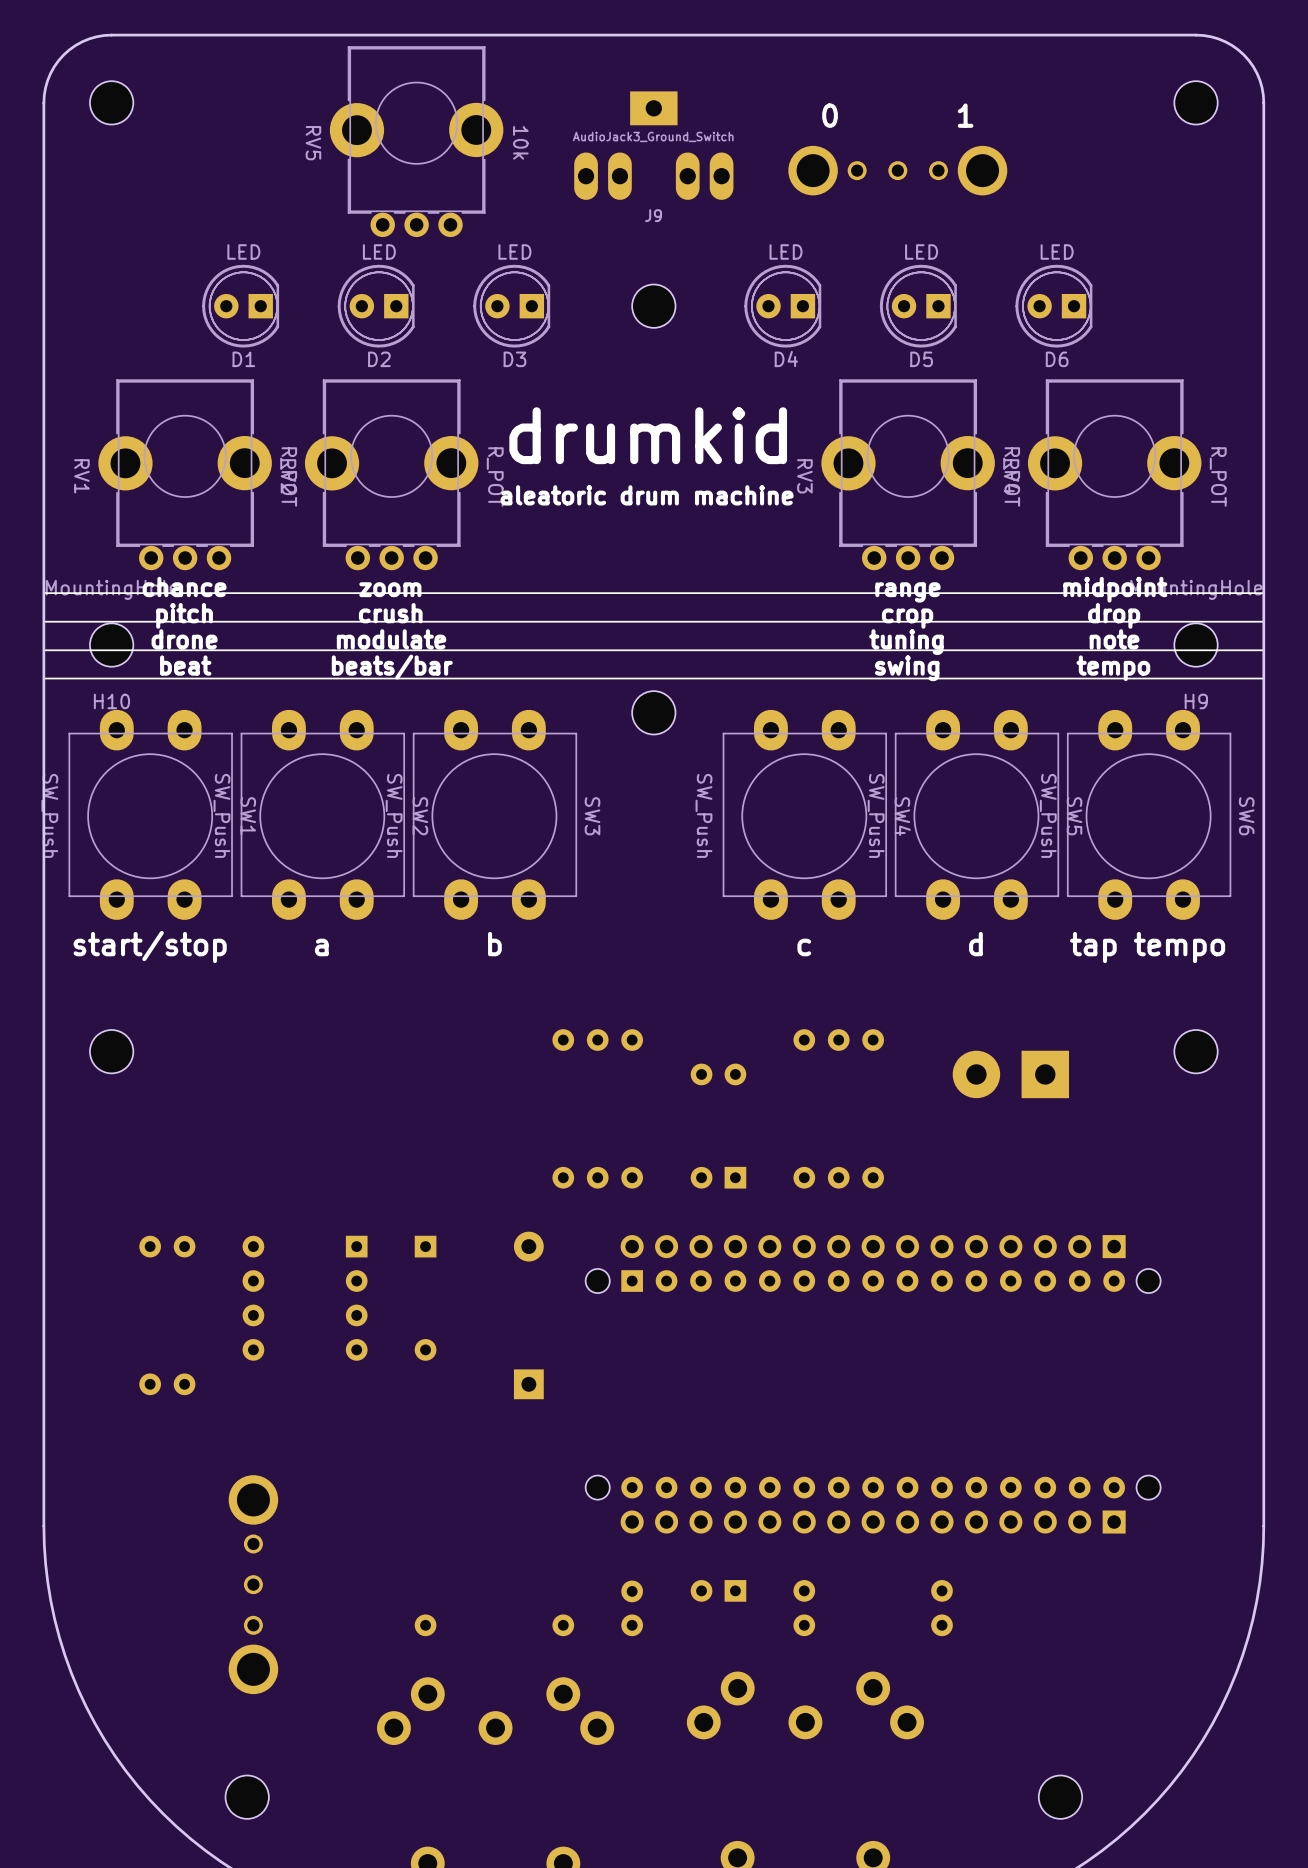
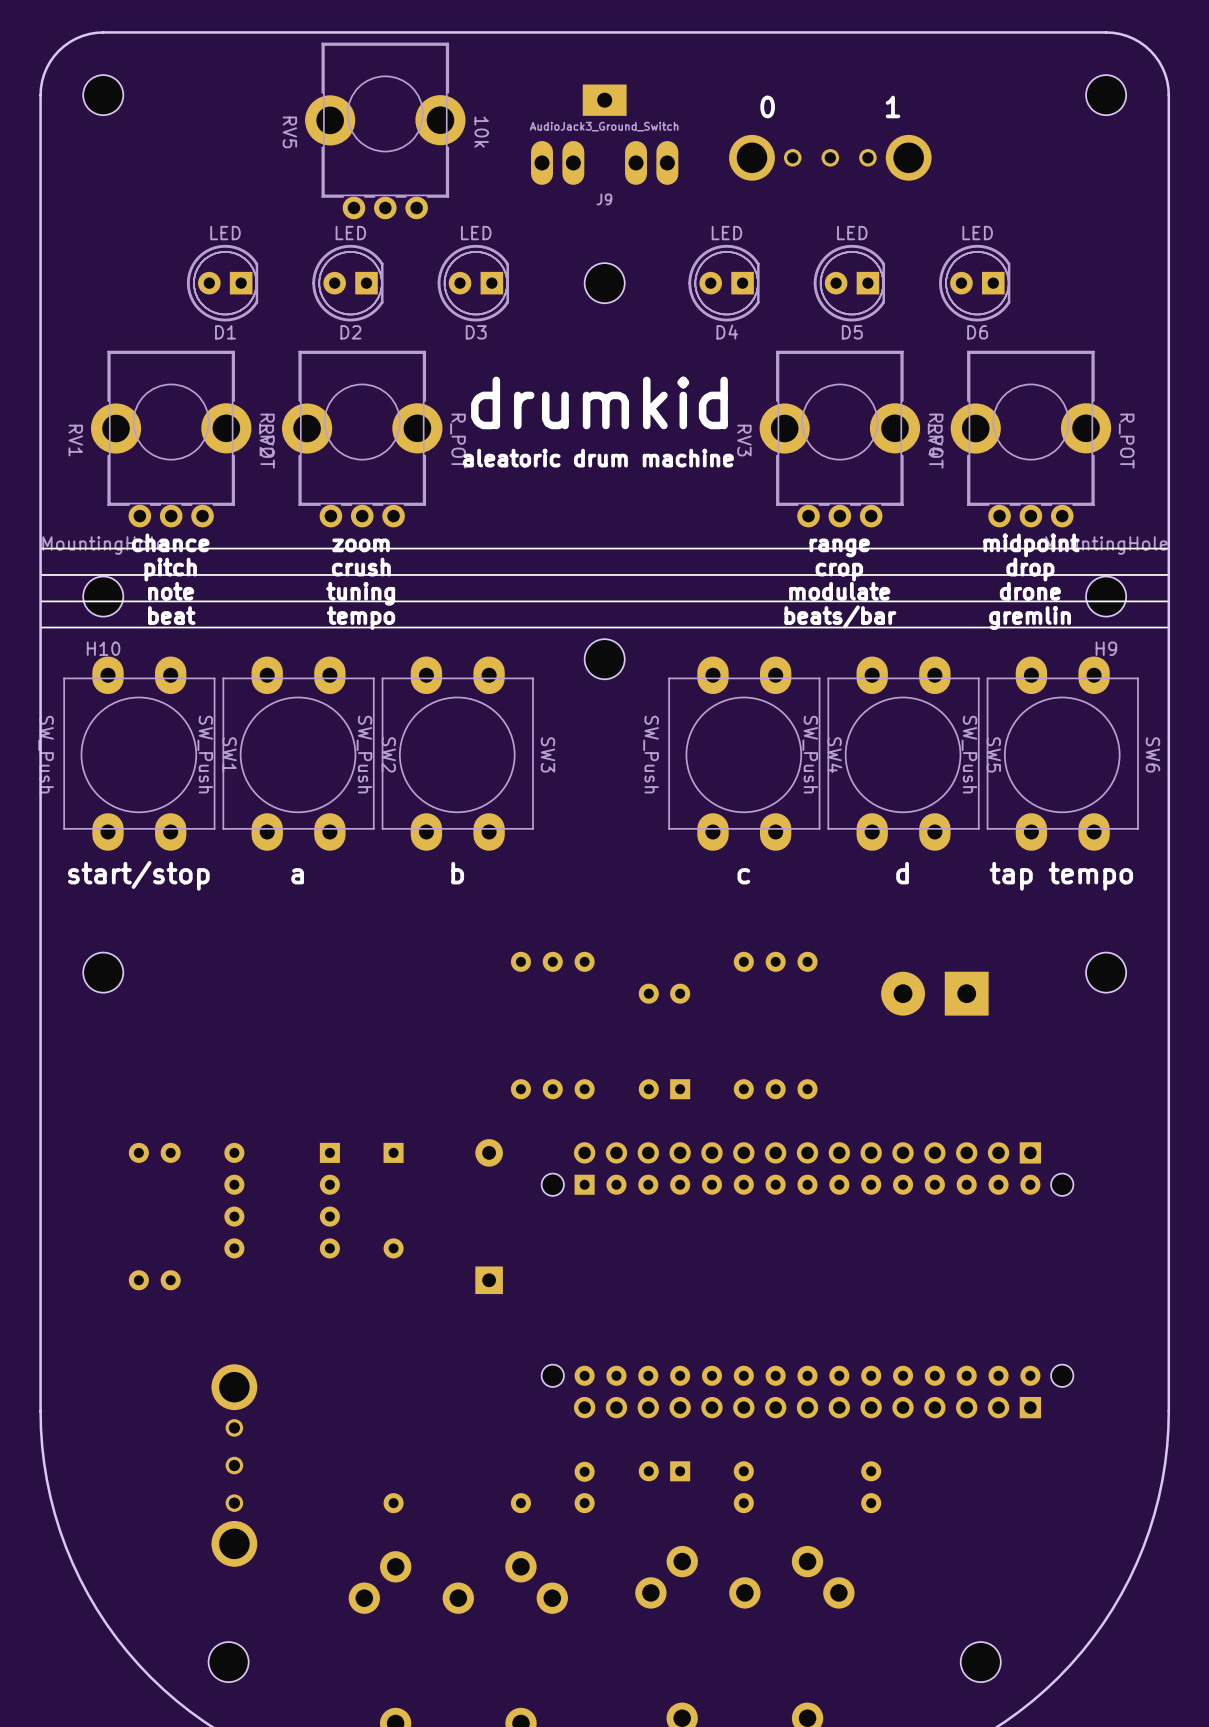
text: drone (184, 639) -> note (171, 591)
text: modulate (391, 639) -> tuning (360, 593)
text: note (1114, 639) -> drone (1030, 591)
text: tuning (906, 642) -> modulate (839, 591)
text: beats/bar (392, 667) -> tempo (361, 618)
text: swing (907, 668) -> beats/bar (840, 616)
text: tempo (1113, 668) -> gremlin (1030, 618)

